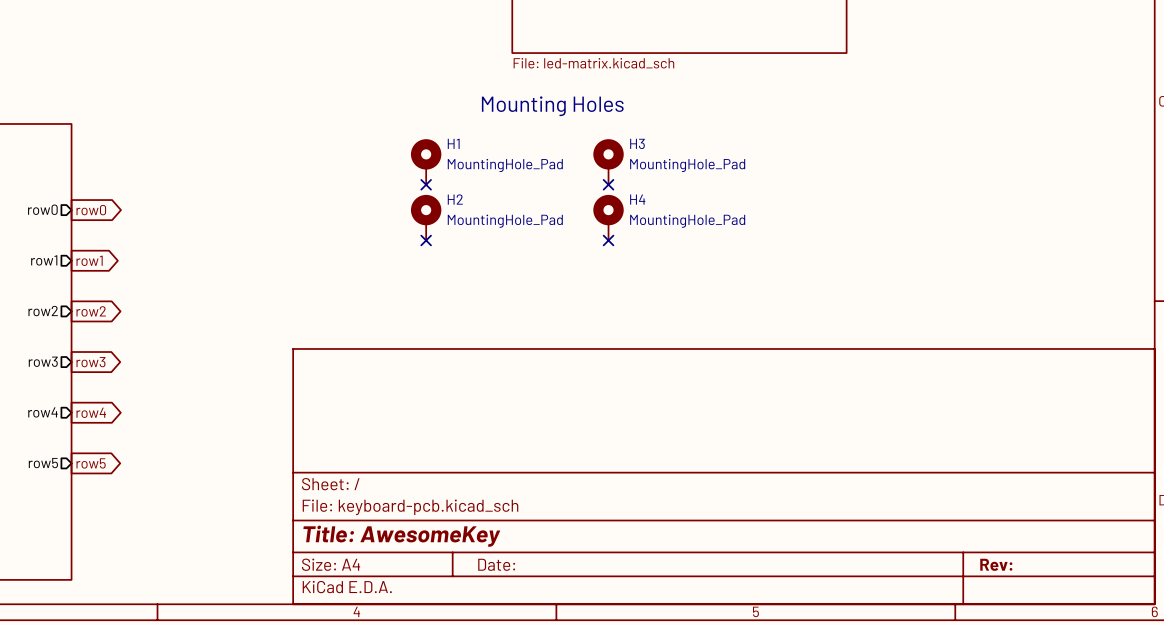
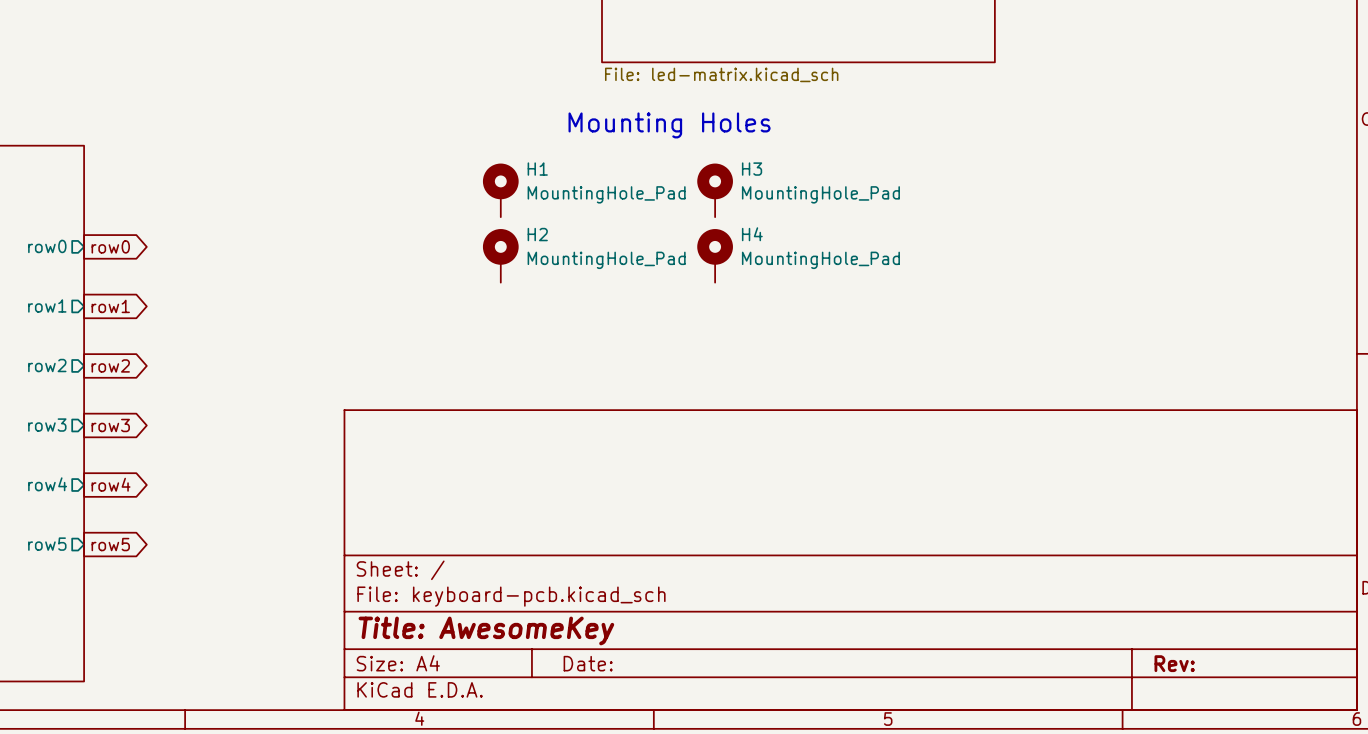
no-connect mark: (426, 184) -> none
no-connect mark: (608, 184) -> none
no-connect mark: (426, 240) -> none
no-connect mark: (608, 240) -> none

